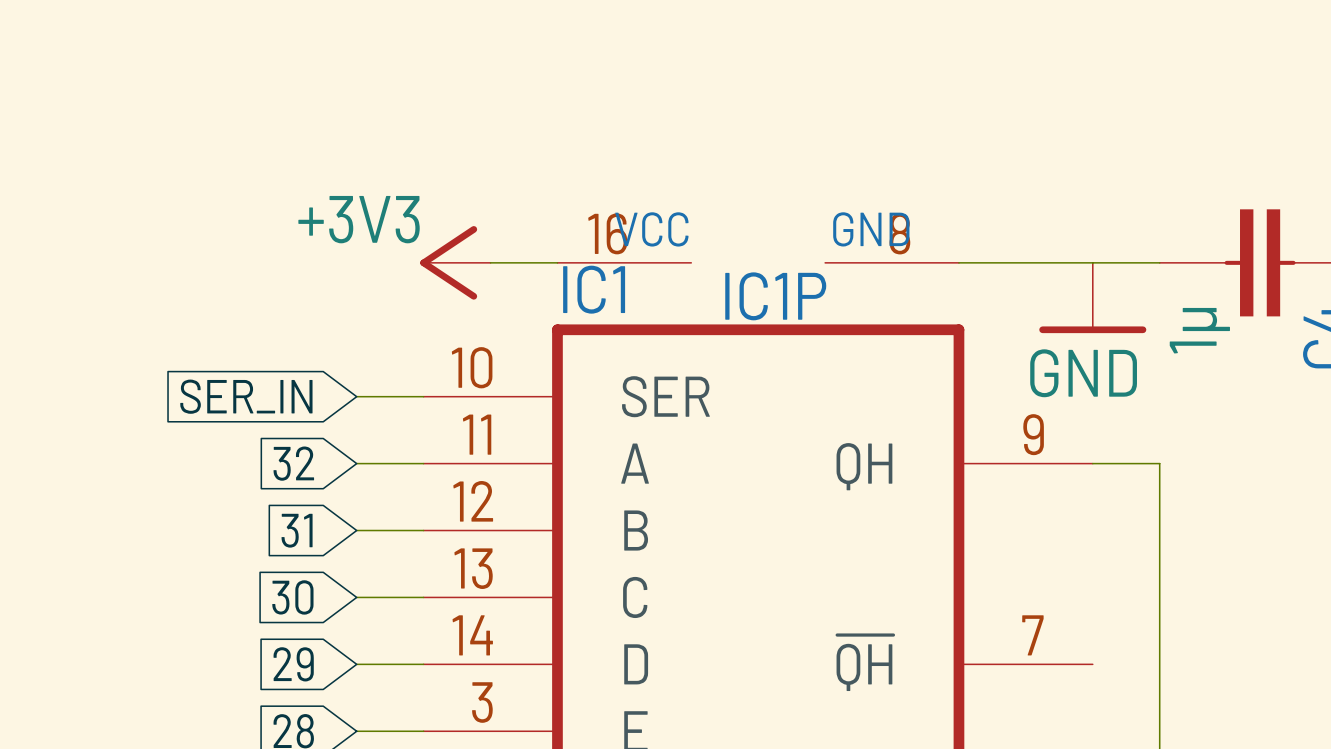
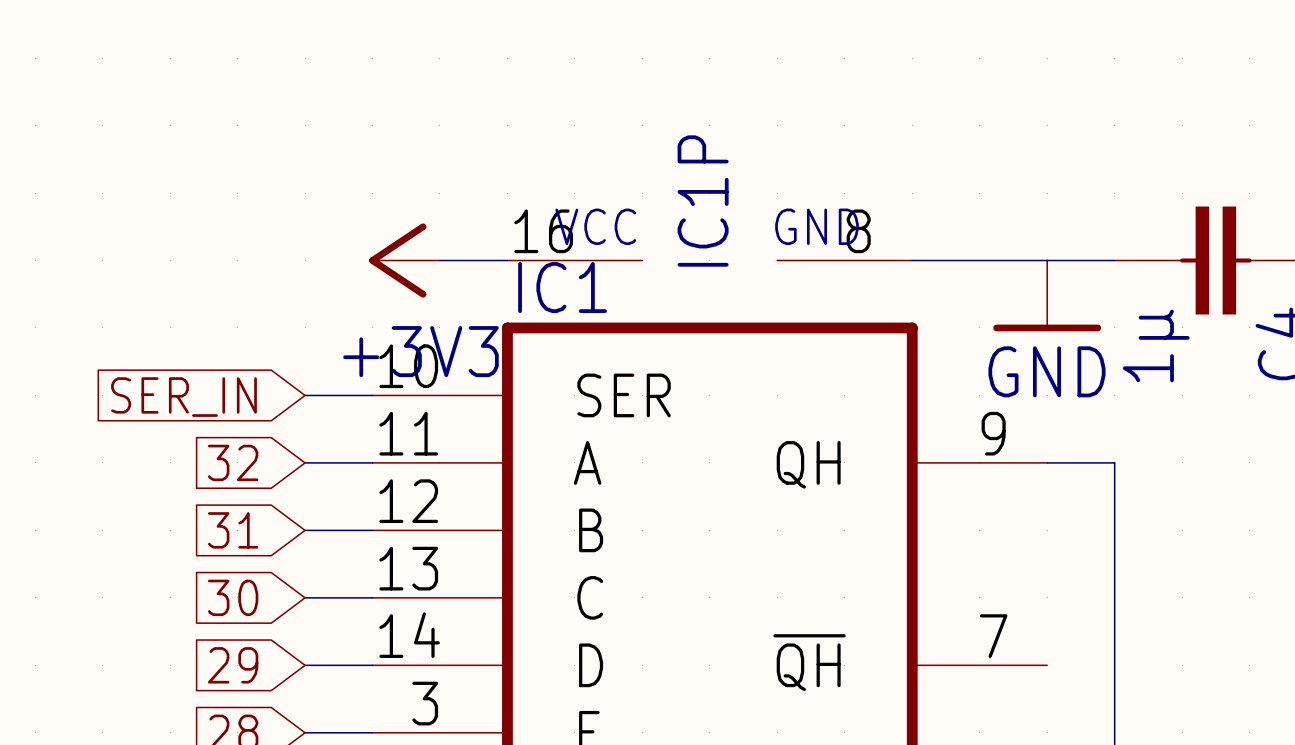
power symbol text position: +3V3 (359, 219) -> +3V3 (420, 351)
IC1P name rotation: 0° (775, 296) -> 90° counterclockwise (703, 201)

